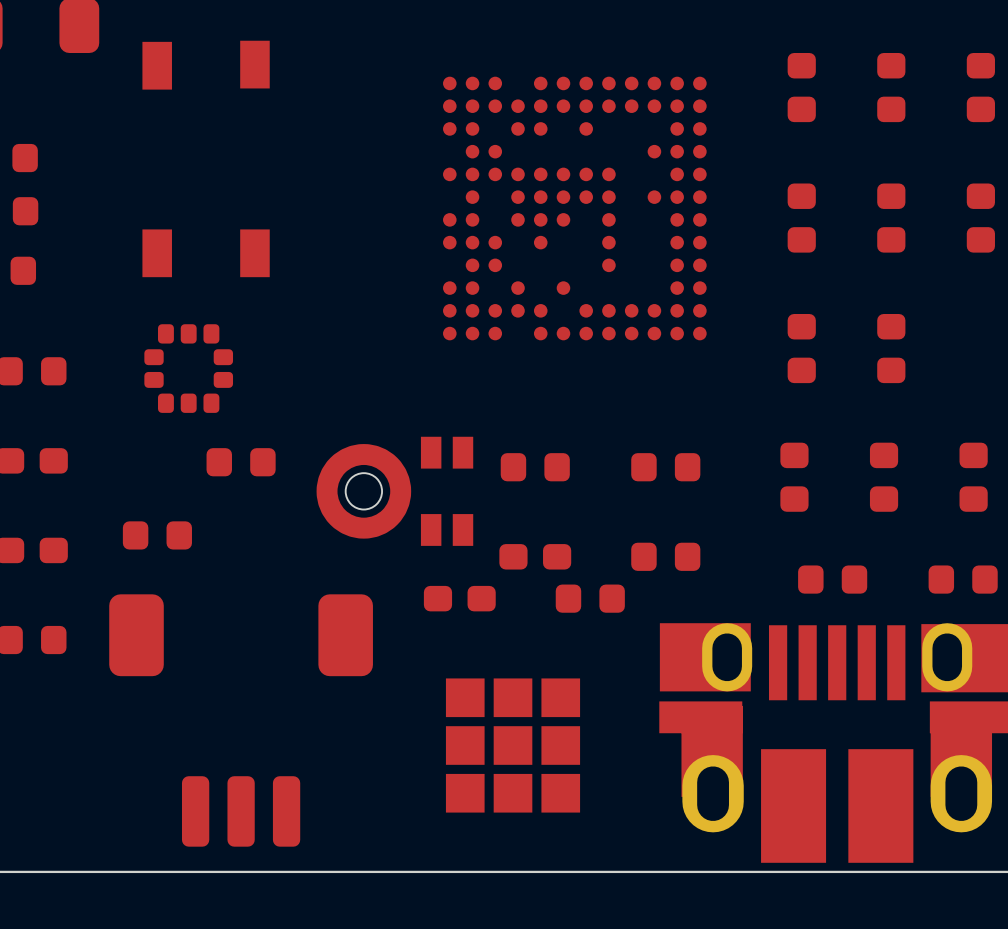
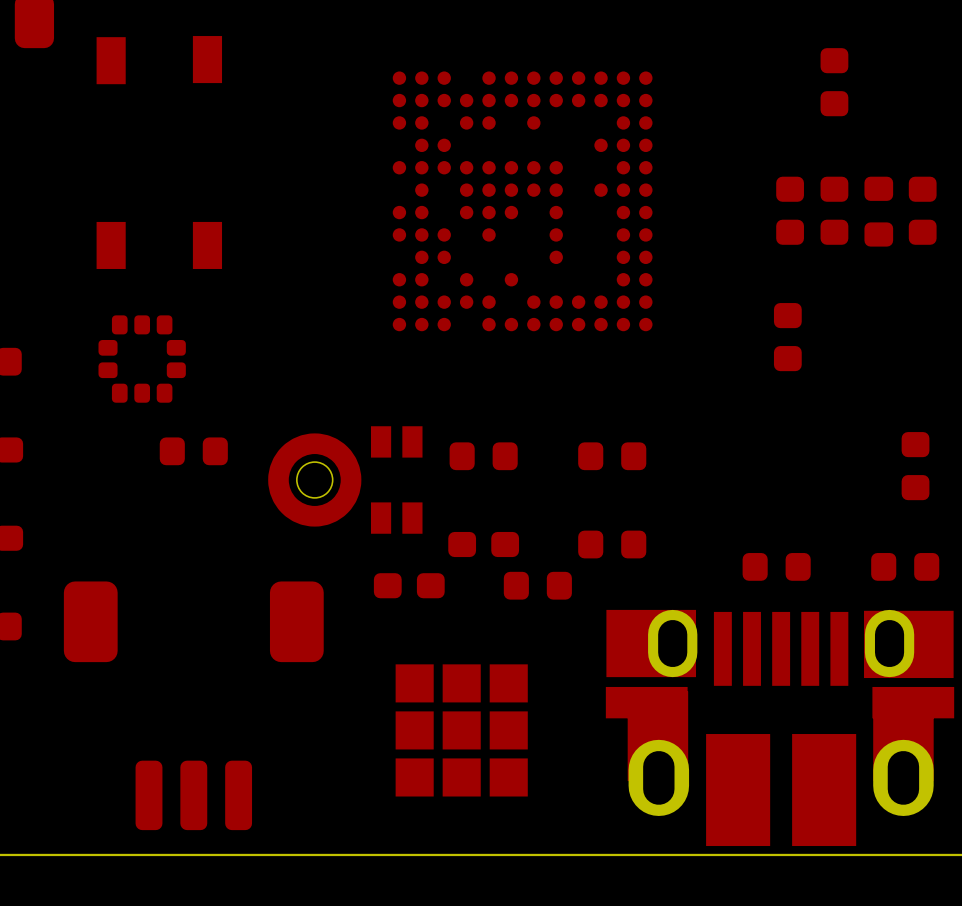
part: (801, 87) -> none
part: (980, 87) -> none
part position: (801, 218) -> (790, 210)
part: none -> (878, 211)
part: none -> (787, 337)
part: (801, 348) -> none
part: (891, 348) -> none
part: (794, 477) -> none
part: (884, 477) -> none
part: (157, 535) -> none

